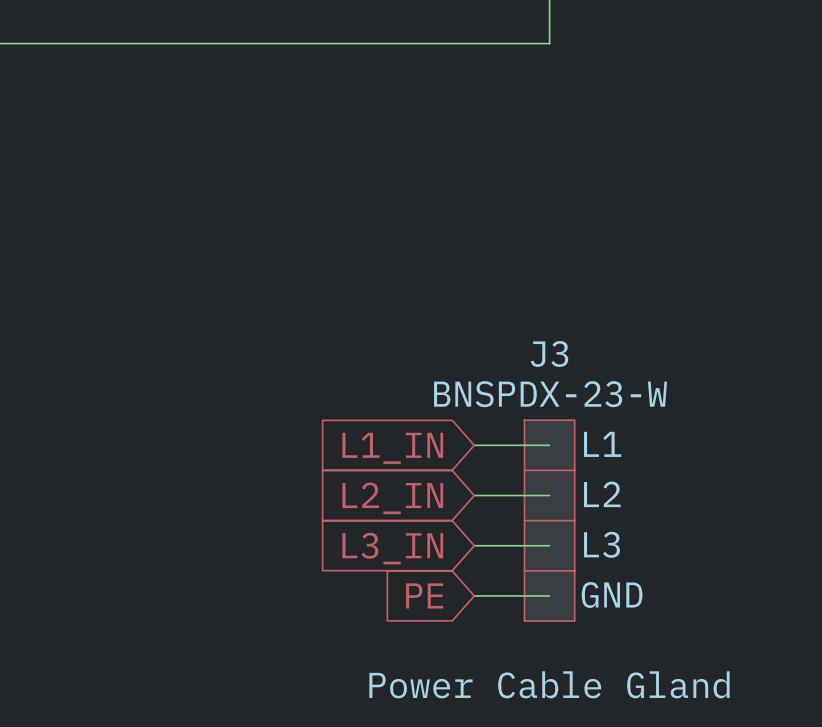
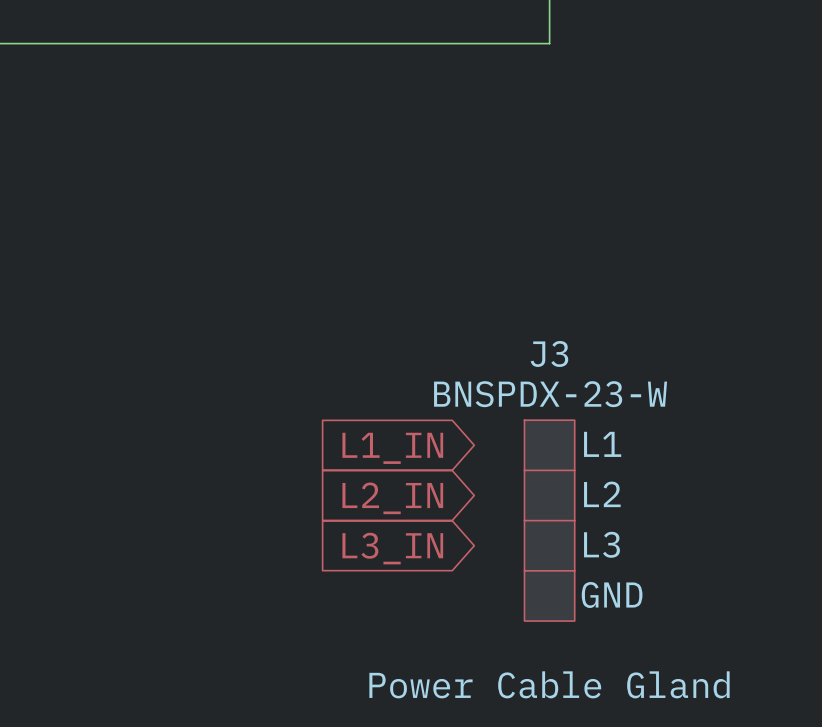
wire: (474, 445) (549, 445) -> none
wire: (474, 495) (549, 495) -> none
wire: (474, 545) (549, 545) -> none
global label: PE (424, 595) -> none
wire: (474, 595) (549, 595) -> none

